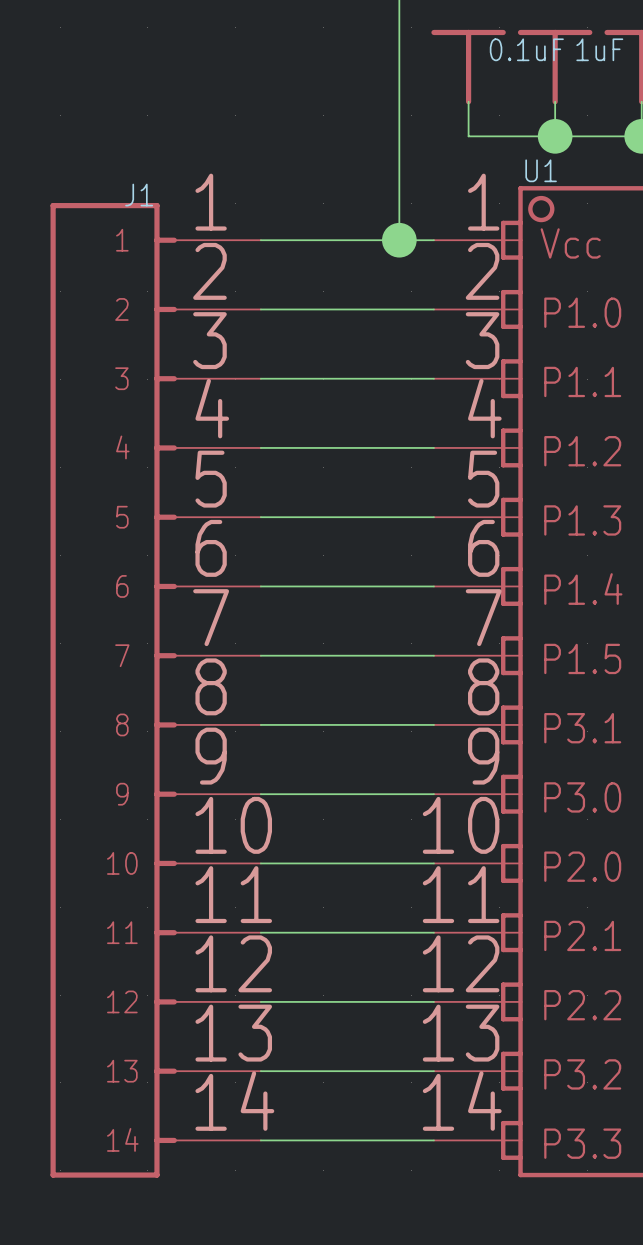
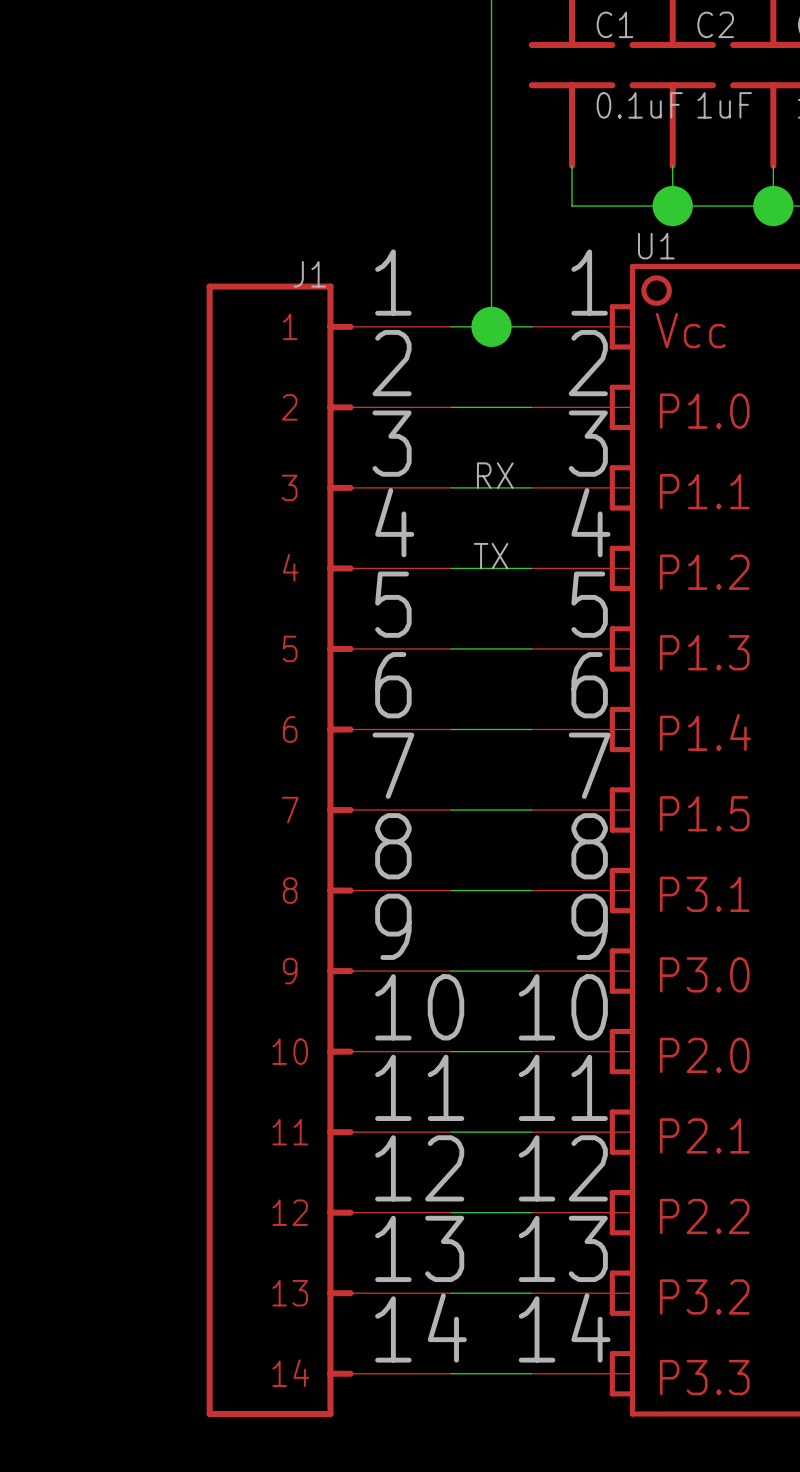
label: none -> RX (495, 475)
label: none -> TX (491, 556)
J1 position: (155, 690) -> (328, 850)

